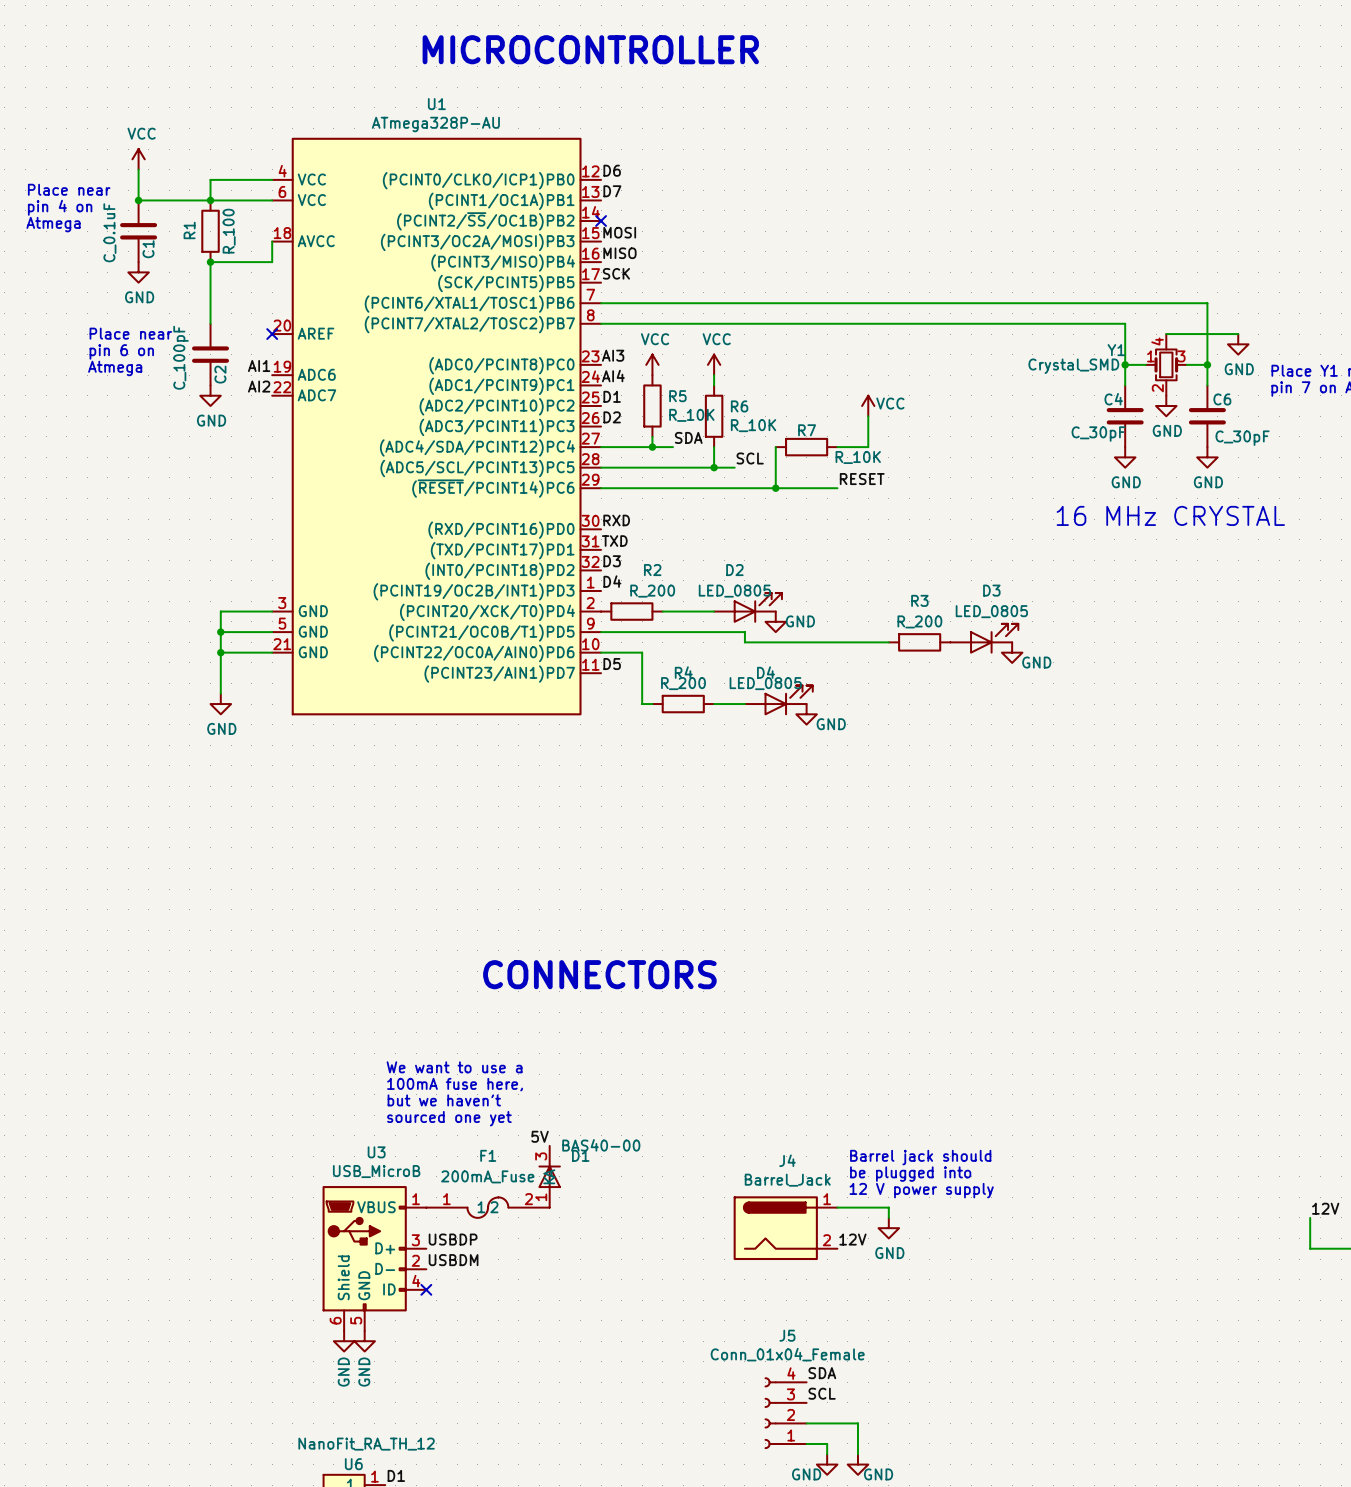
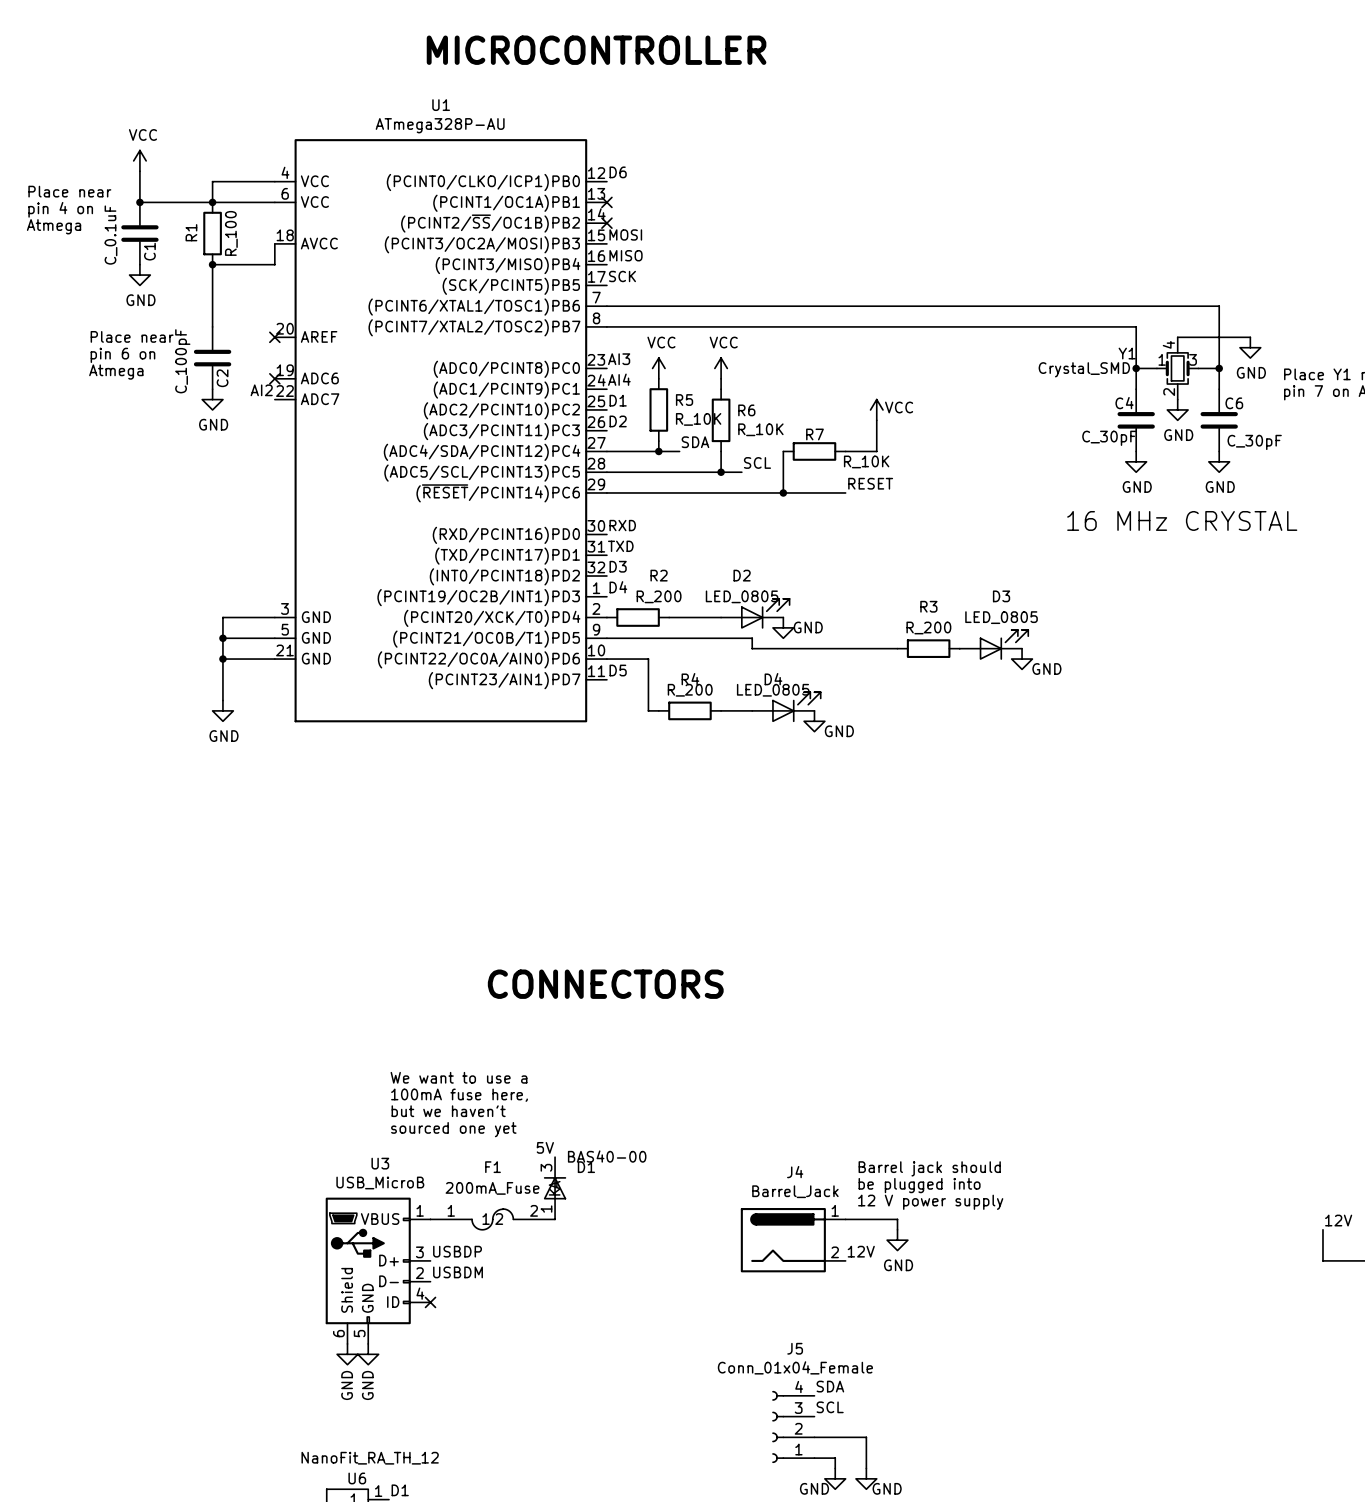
label: D7 (612, 191) -> none
no-connect mark: none -> (606, 202)
label: AI1 (259, 365) -> none
no-connect mark: none -> (274, 378)

